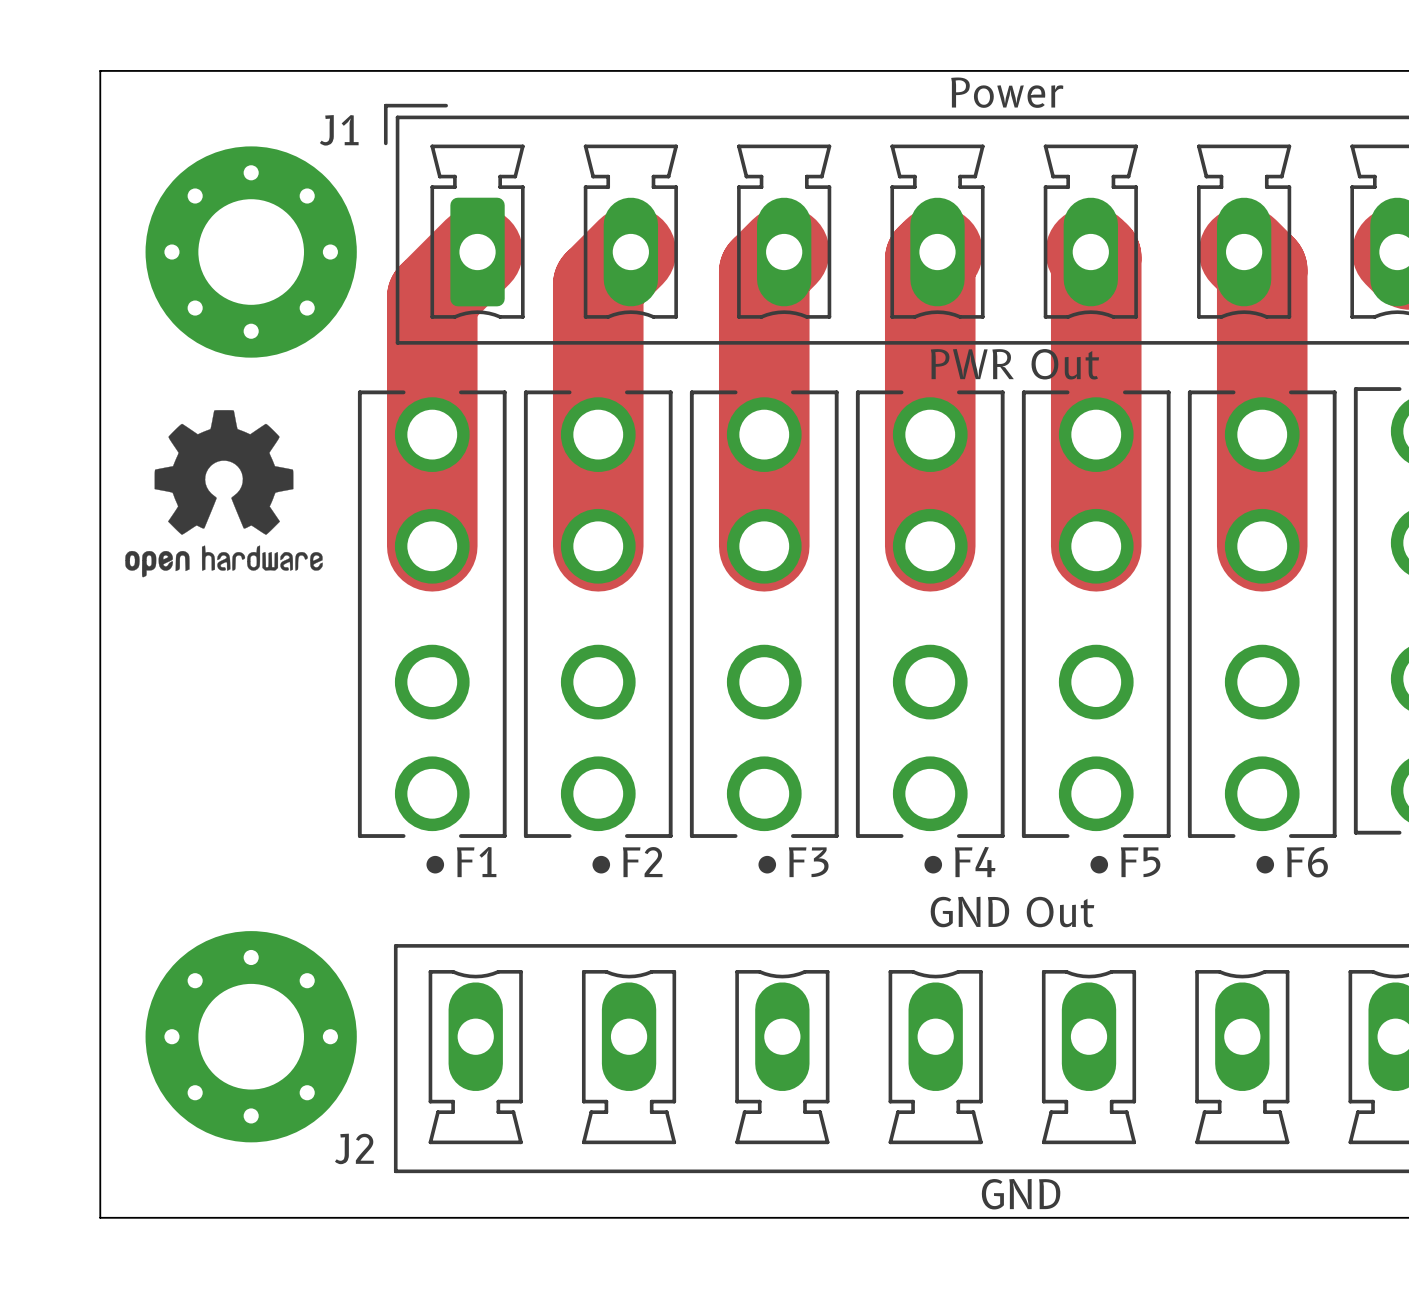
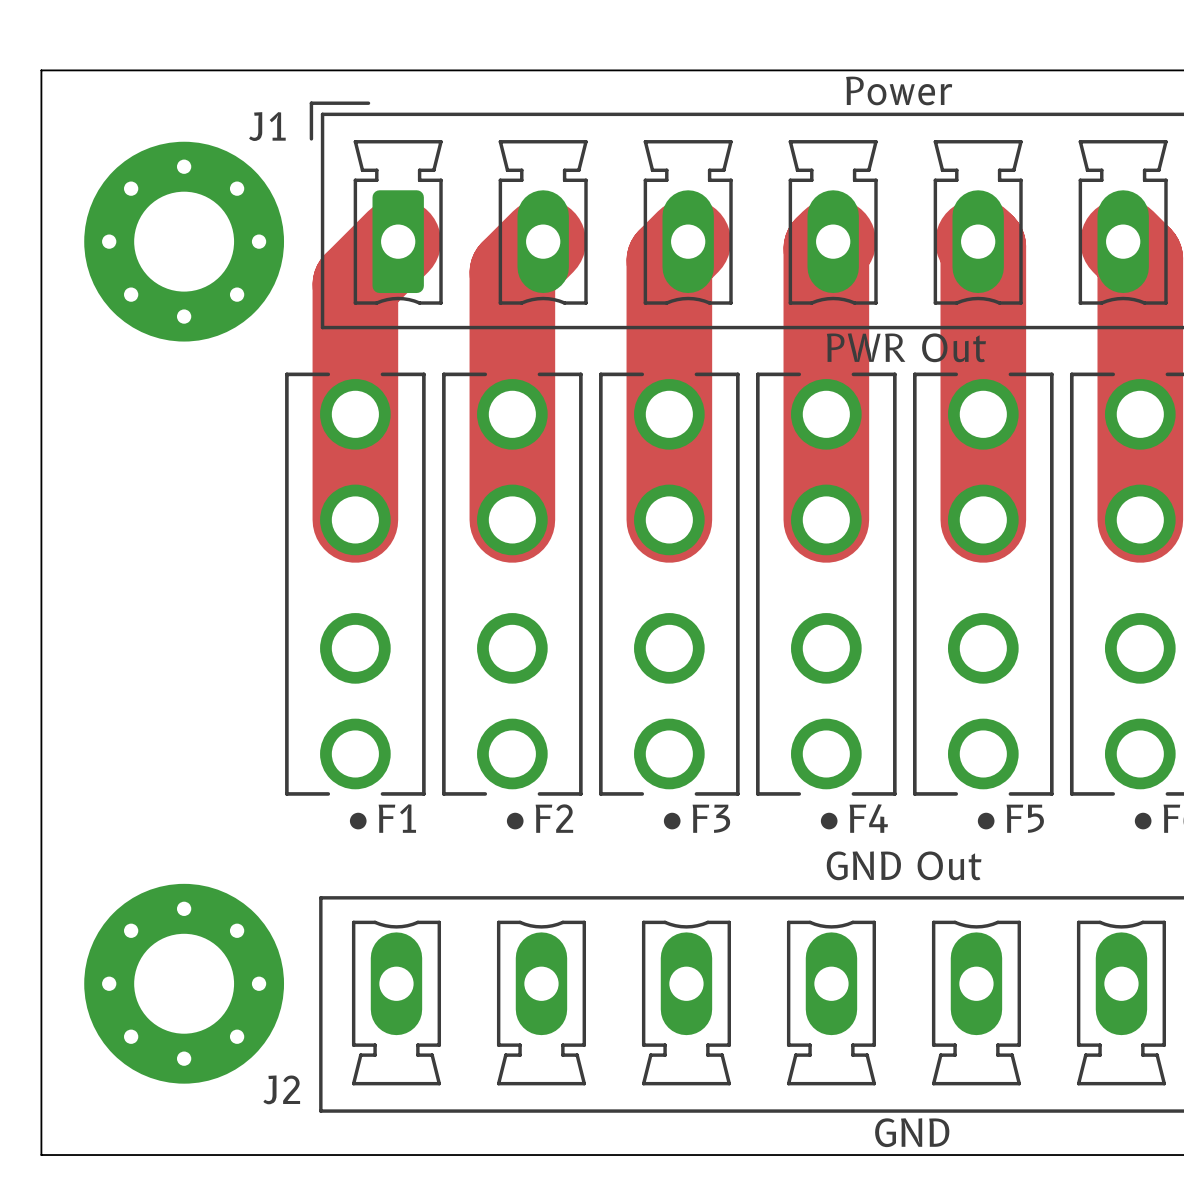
drawing: [125, 410, 323, 578] -> none

